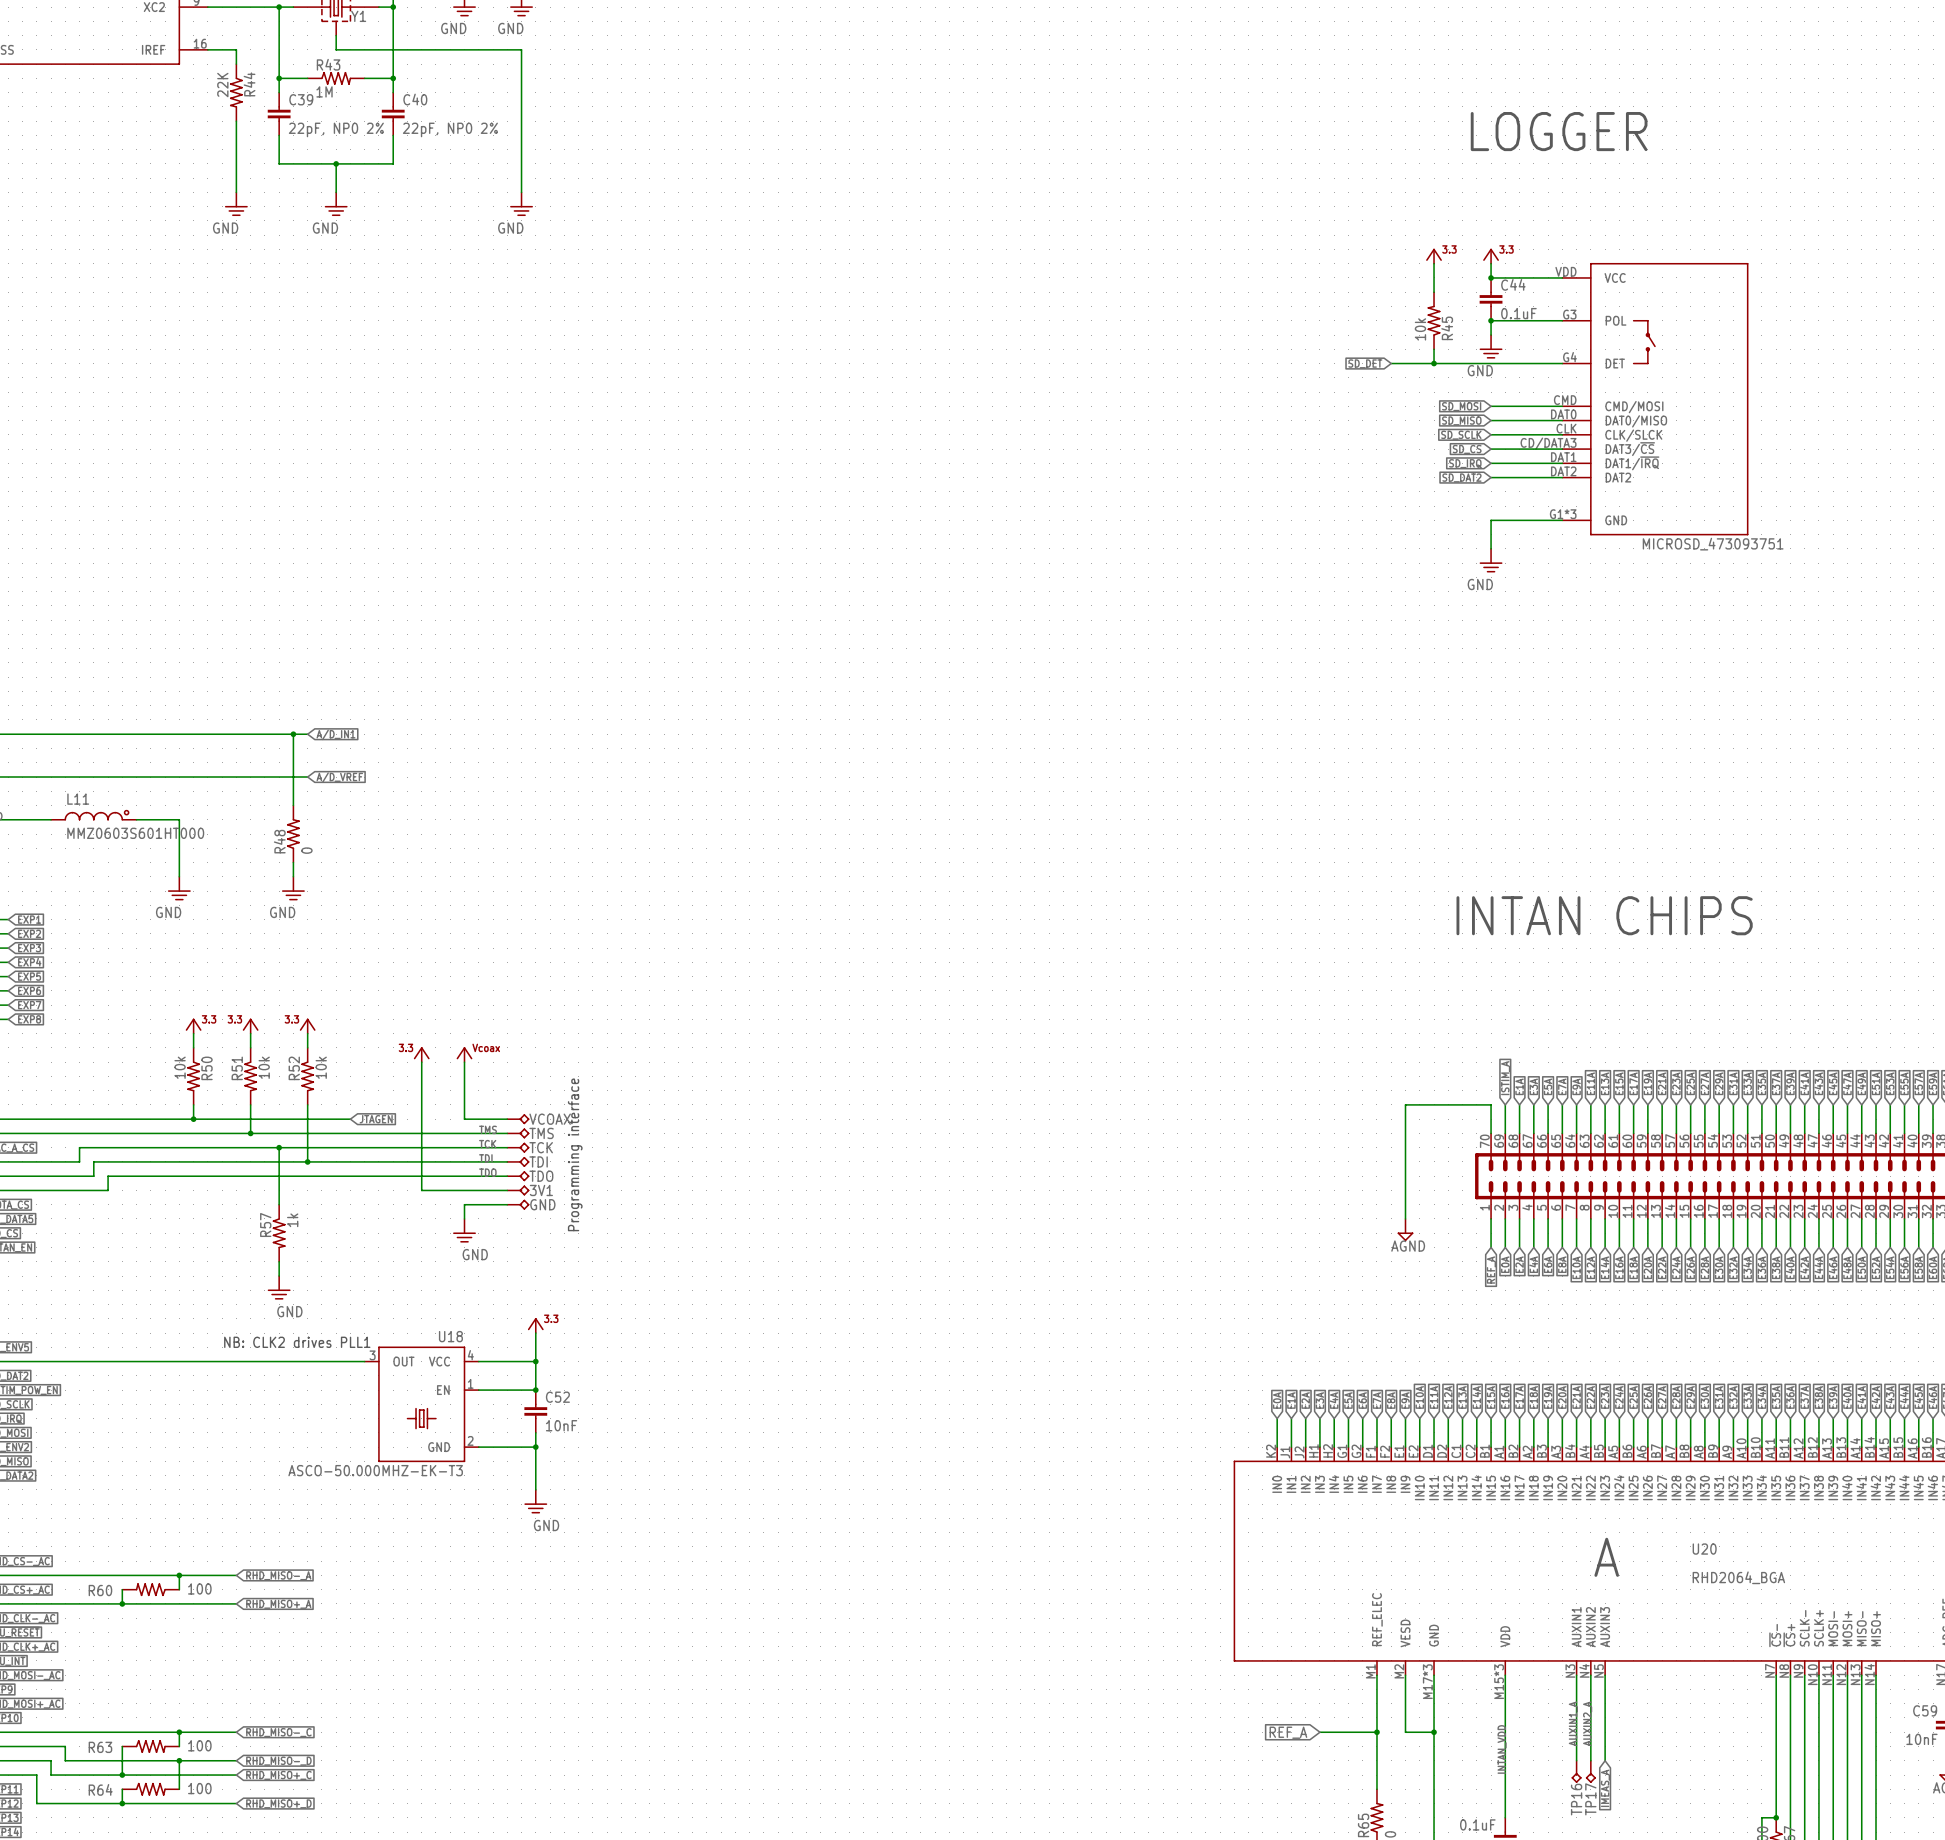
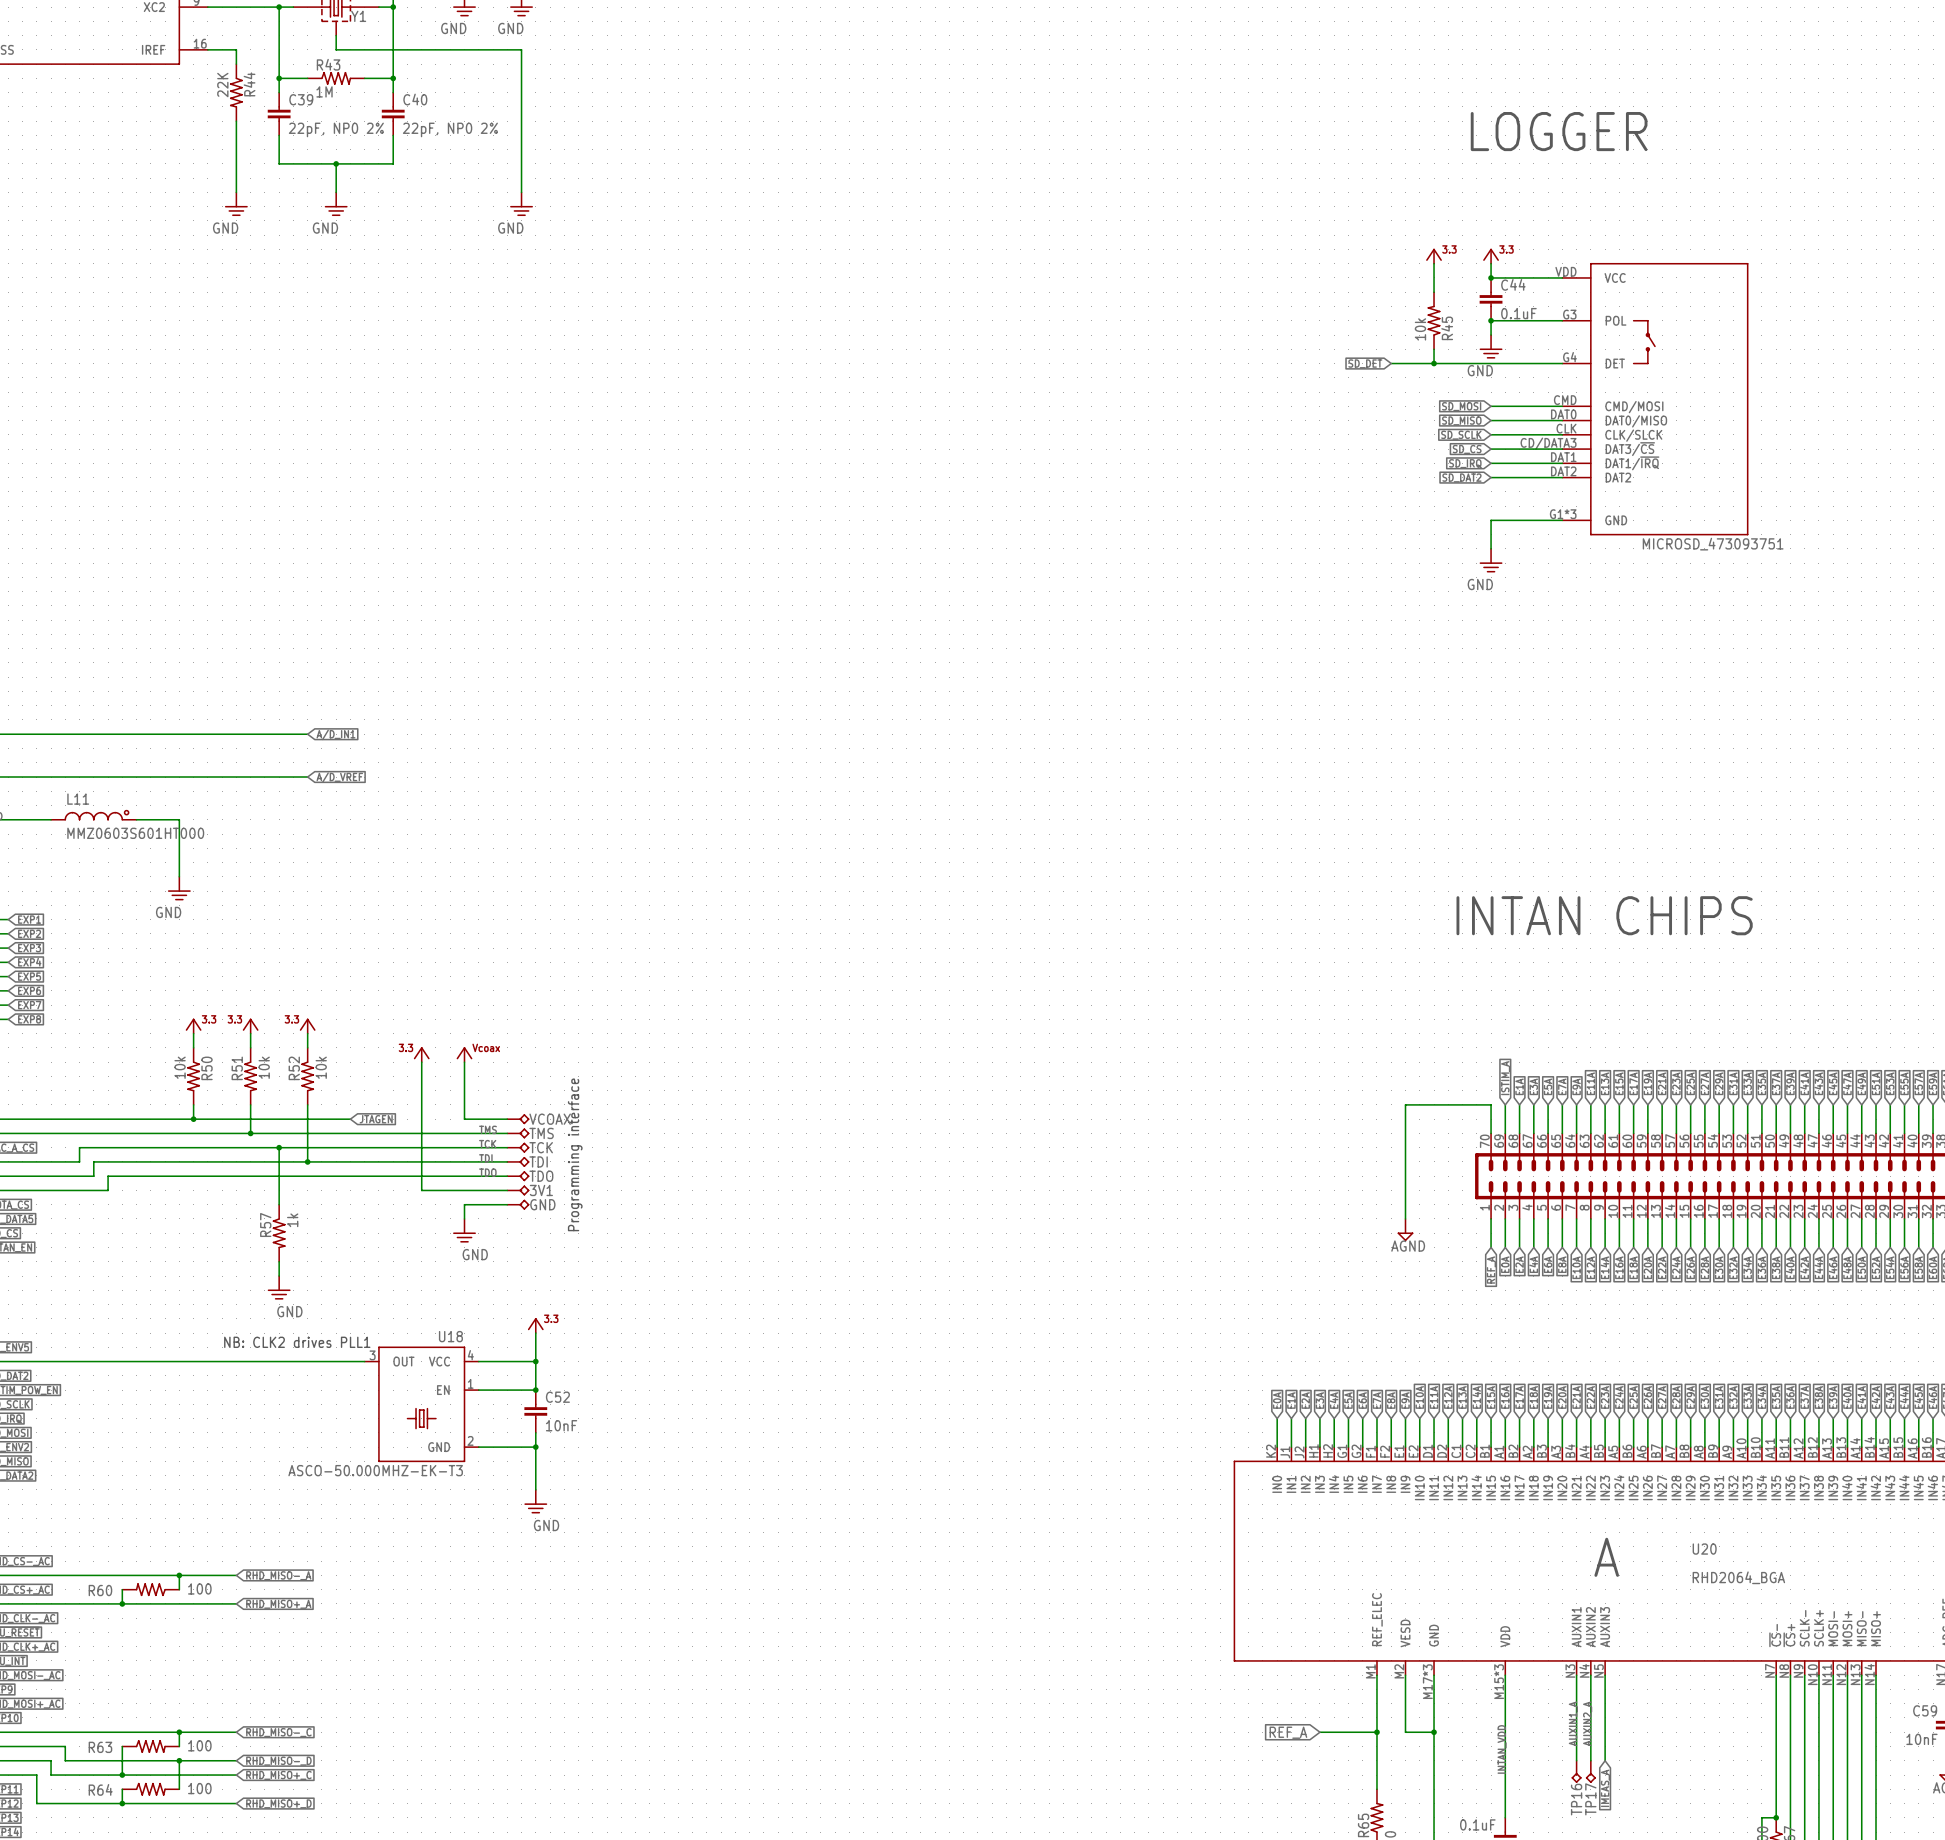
wire: (293, 734) (293, 805) -> none
junction: (293, 734) -> none
R48: 0 (293, 834) -> none
wire: (293, 862) (293, 876) -> none
power symbol: GND (293, 888) -> none

